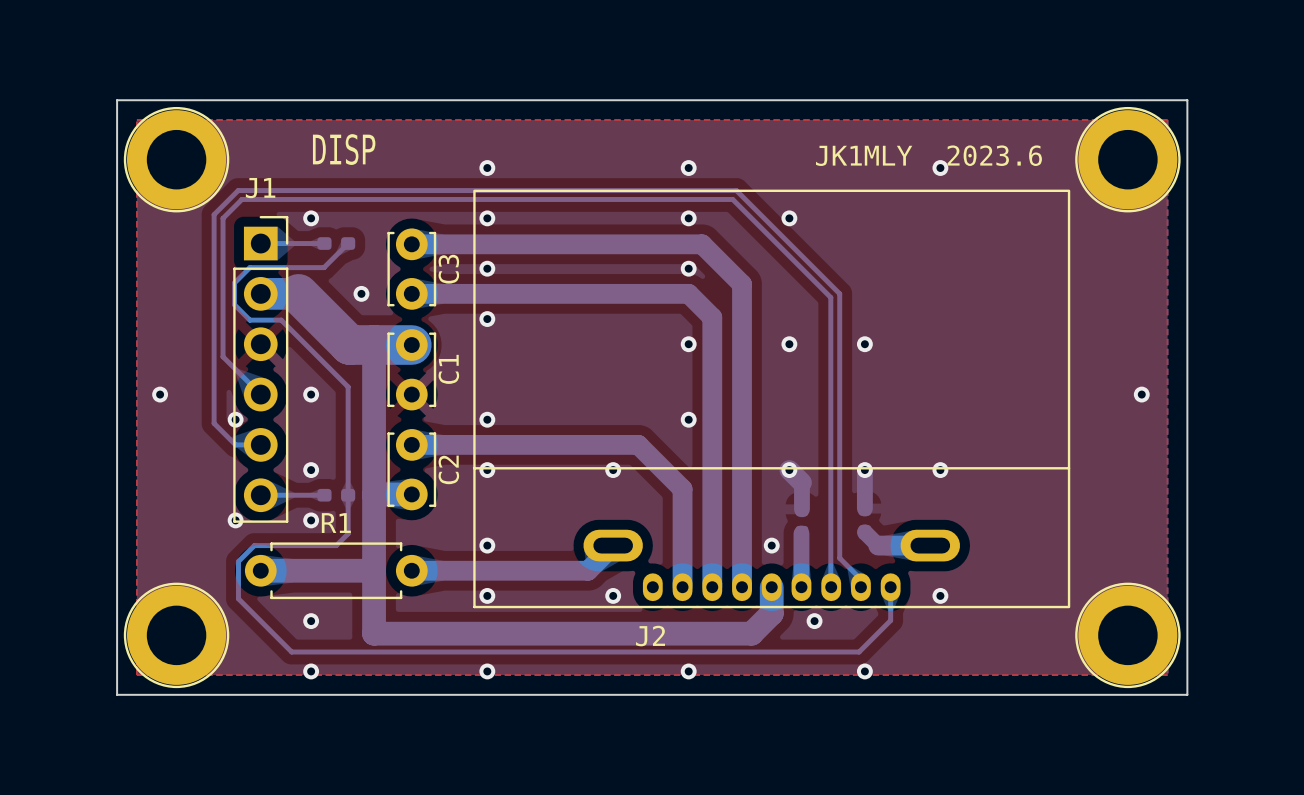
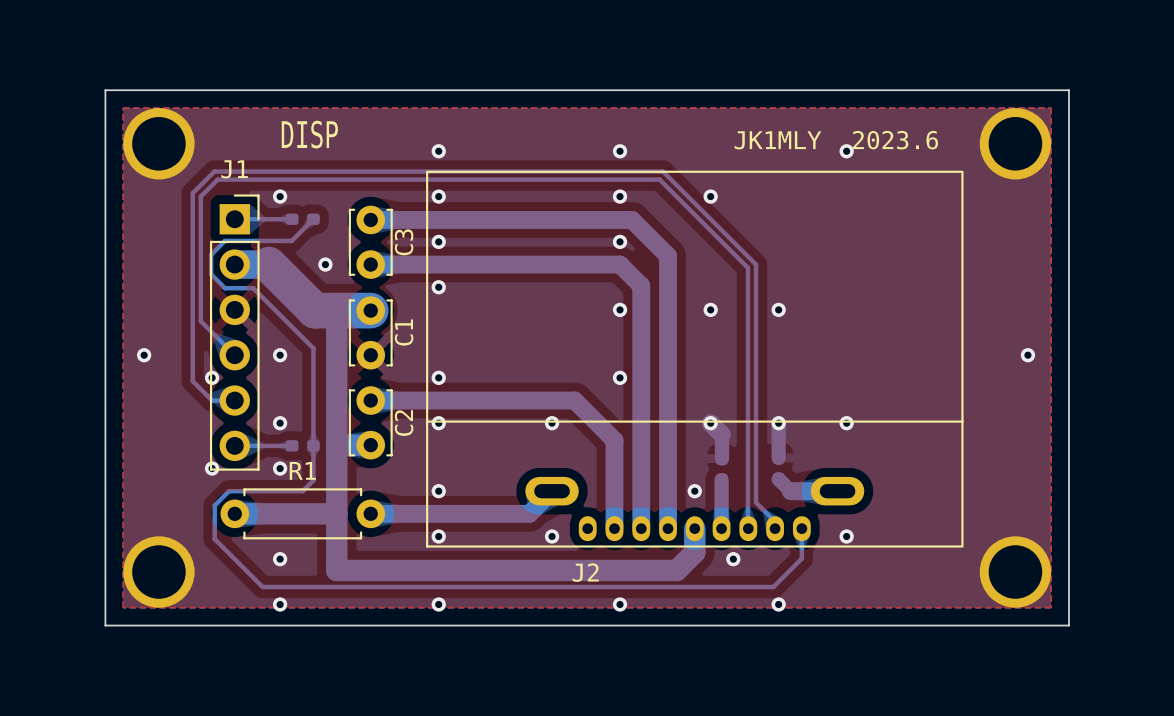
part footprint: [123, 106, 230, 213] -> [123, 108, 195, 180]
part footprint: [1075, 106, 1181, 213] -> [979, 108, 1052, 180]
part footprint: [123, 582, 230, 689] -> [123, 536, 195, 608]
part footprint: [1075, 582, 1181, 689] -> [979, 536, 1052, 608]

